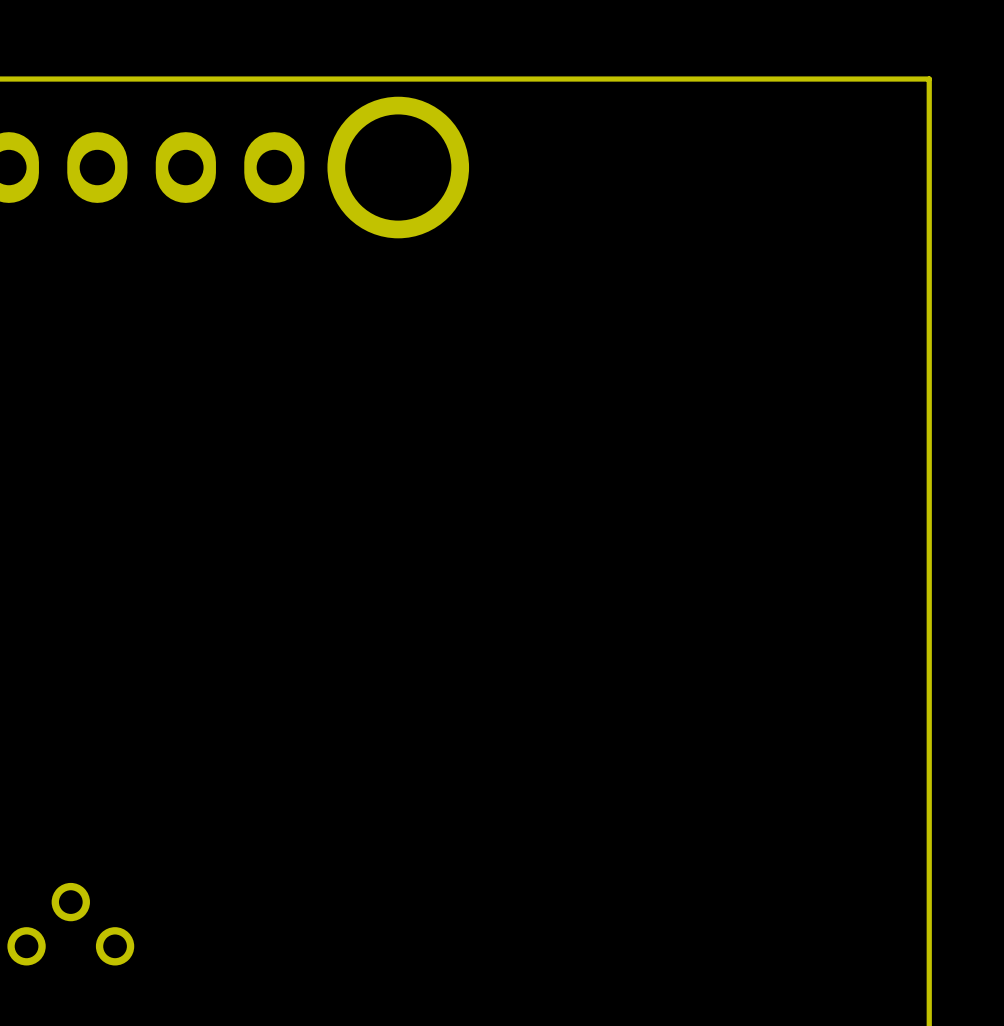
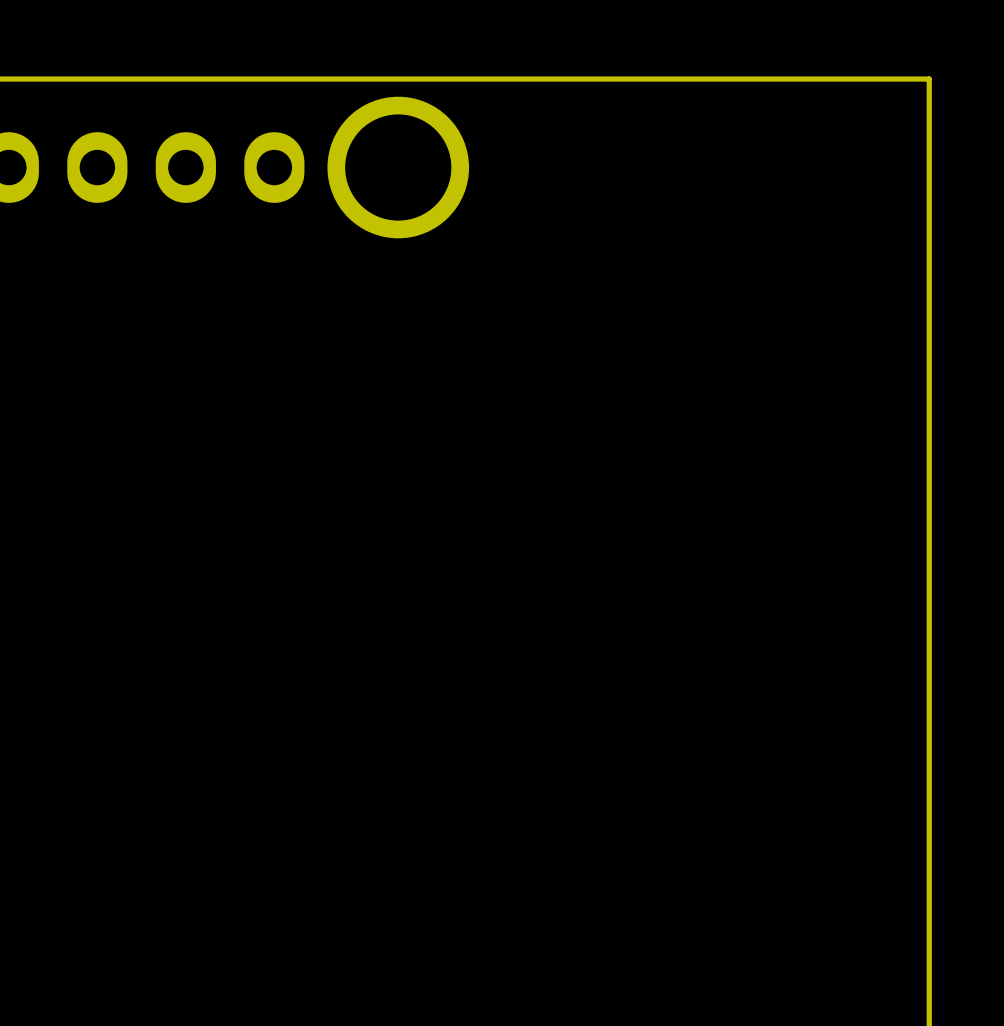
part: (70, 924) -> none

